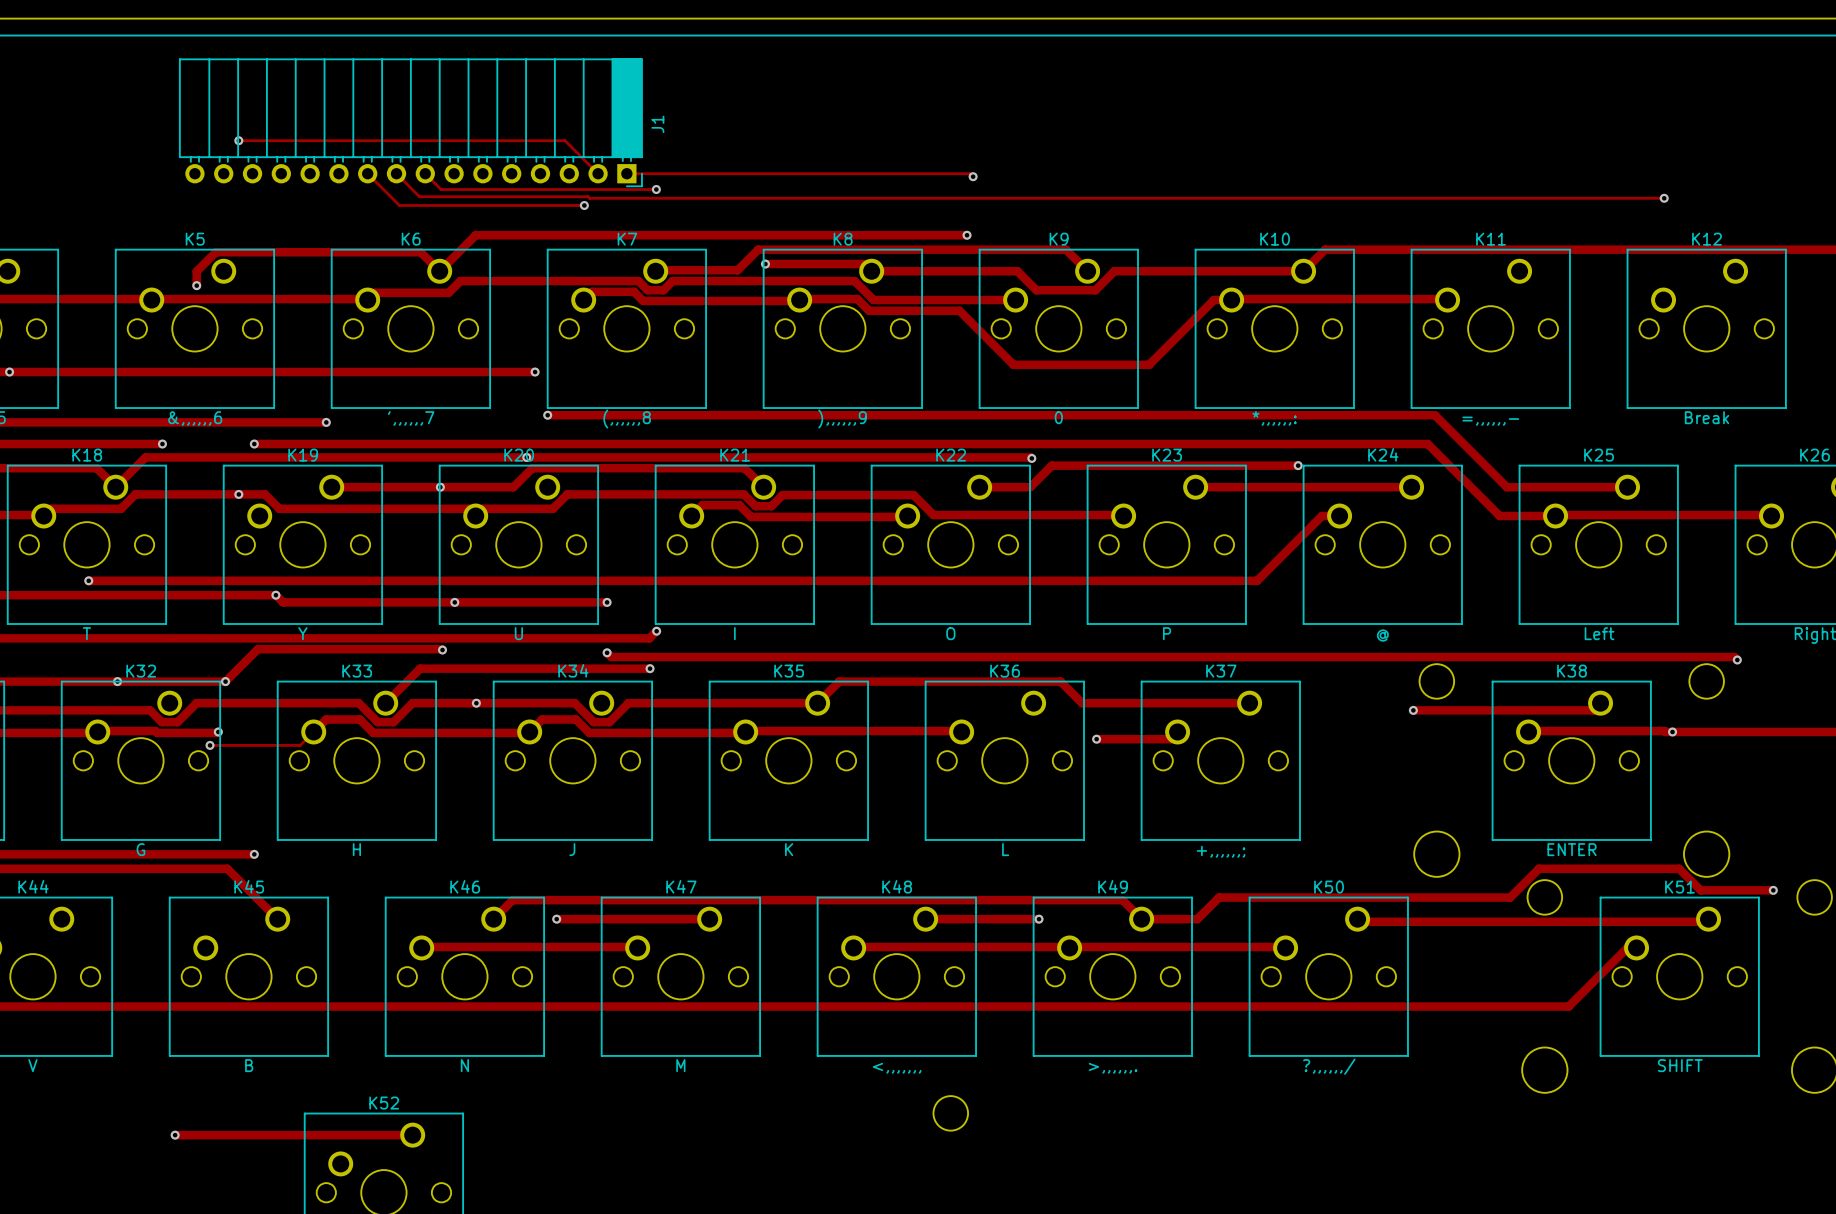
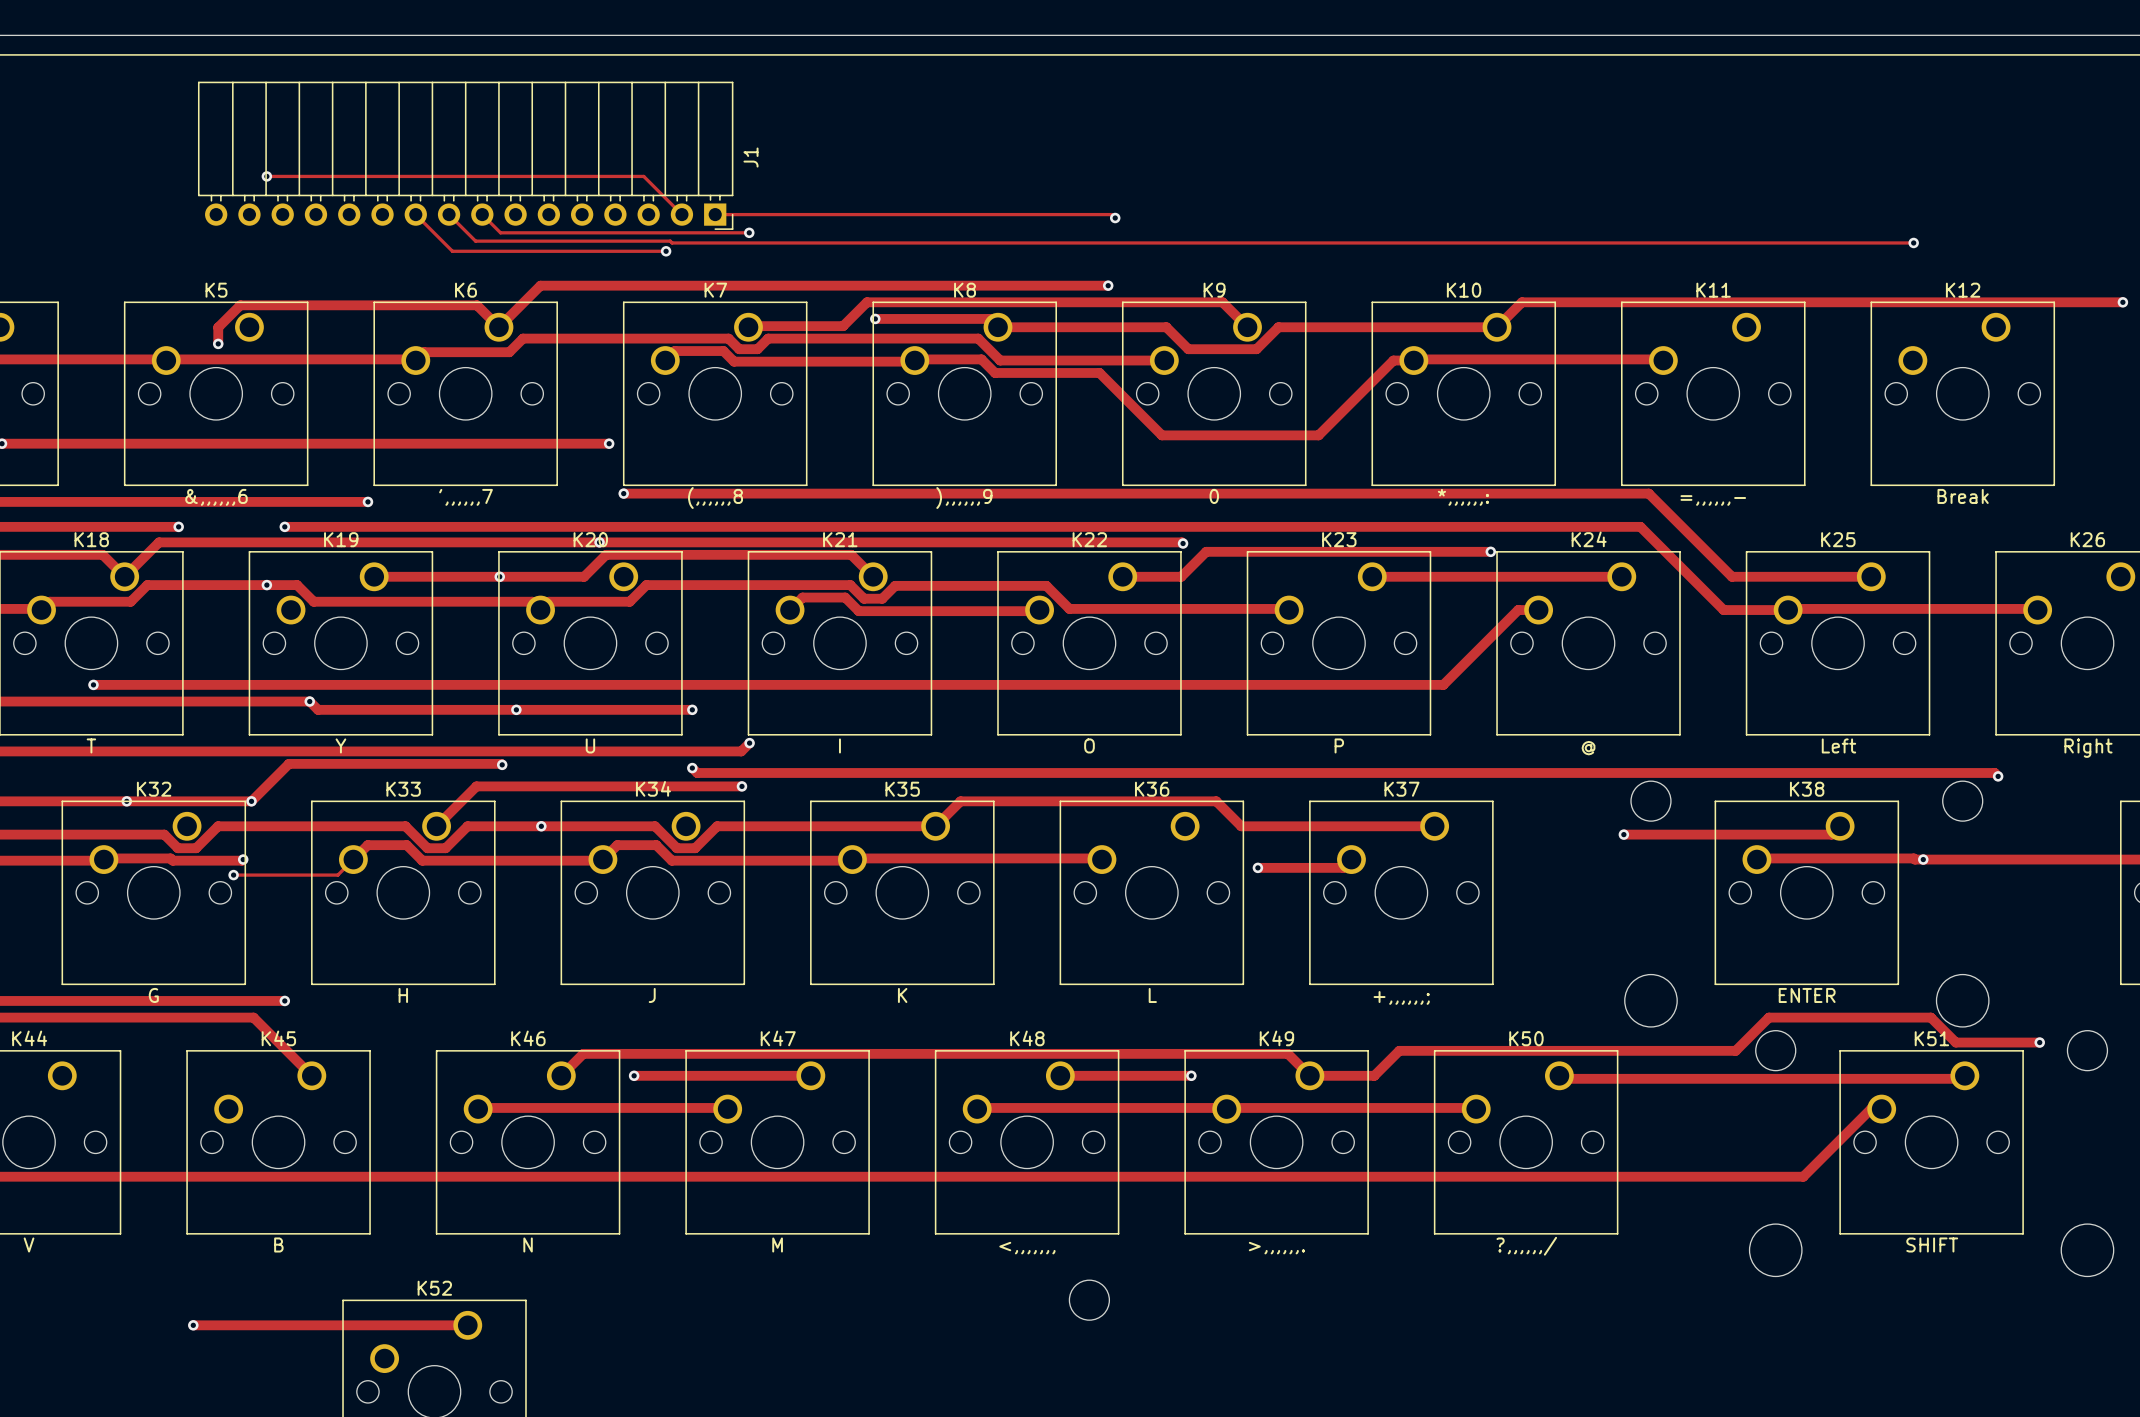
J1 footprint: [179, 58, 643, 187] -> [197, 81, 734, 230]

